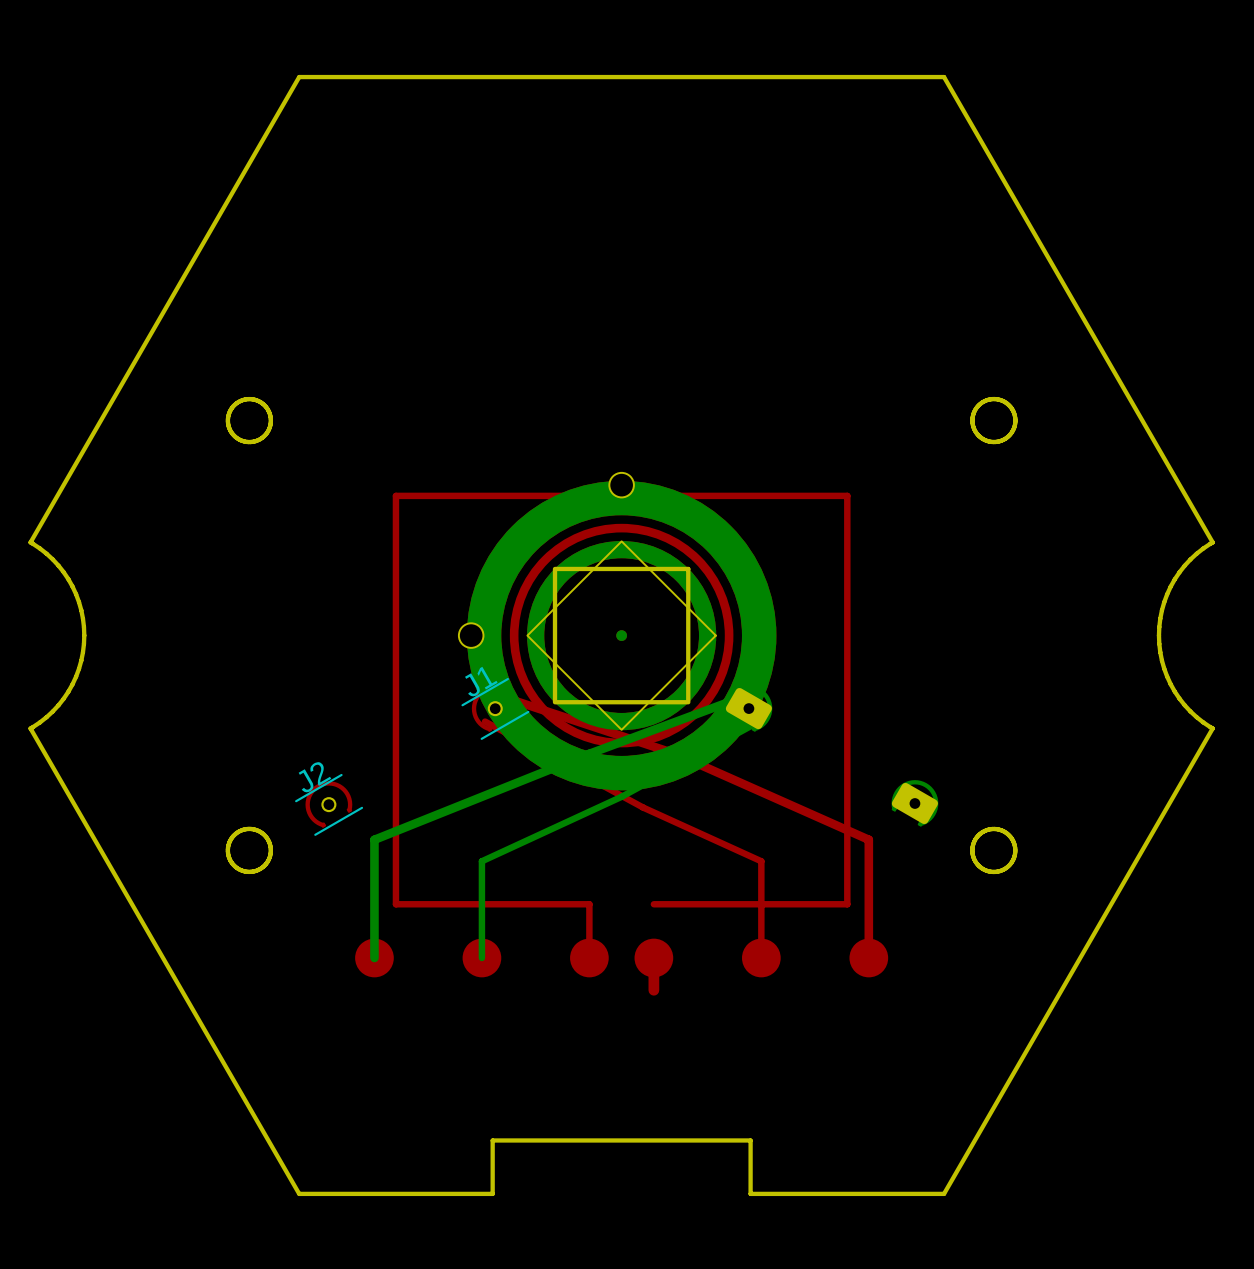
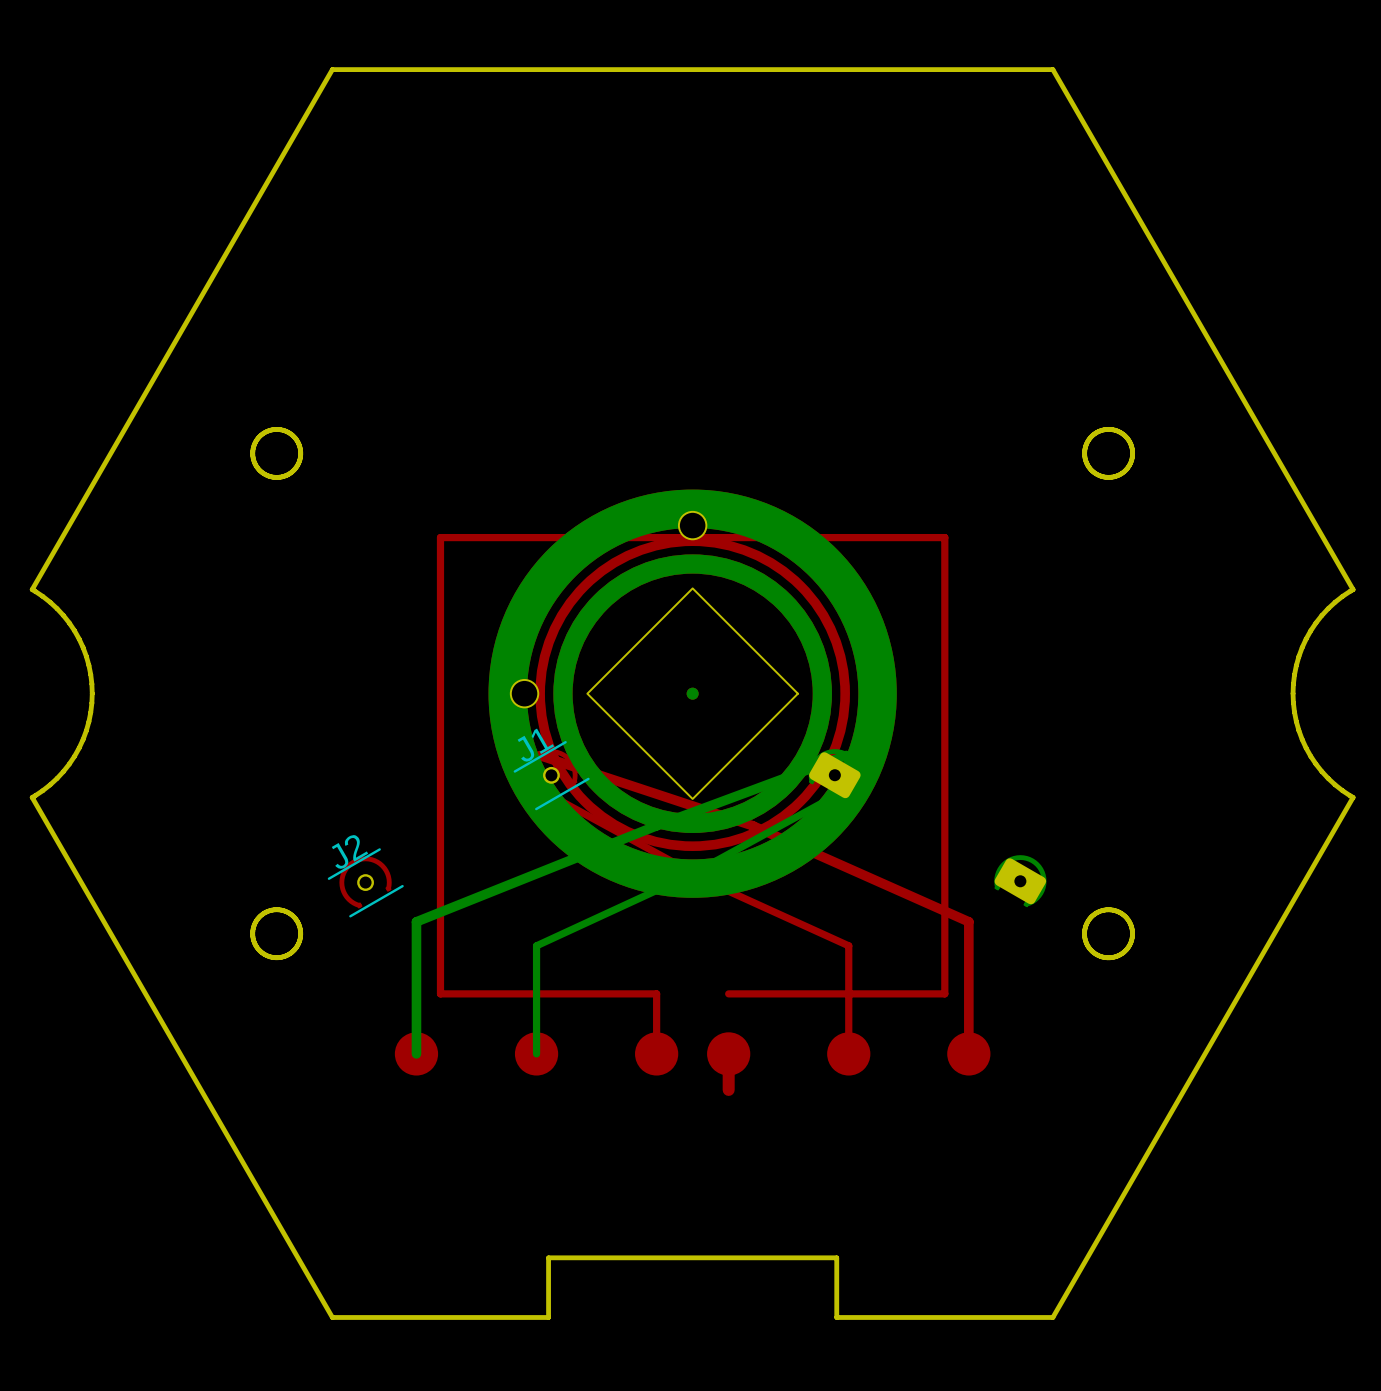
part footprint: [466, 480, 777, 791] -> [488, 489, 897, 898]

